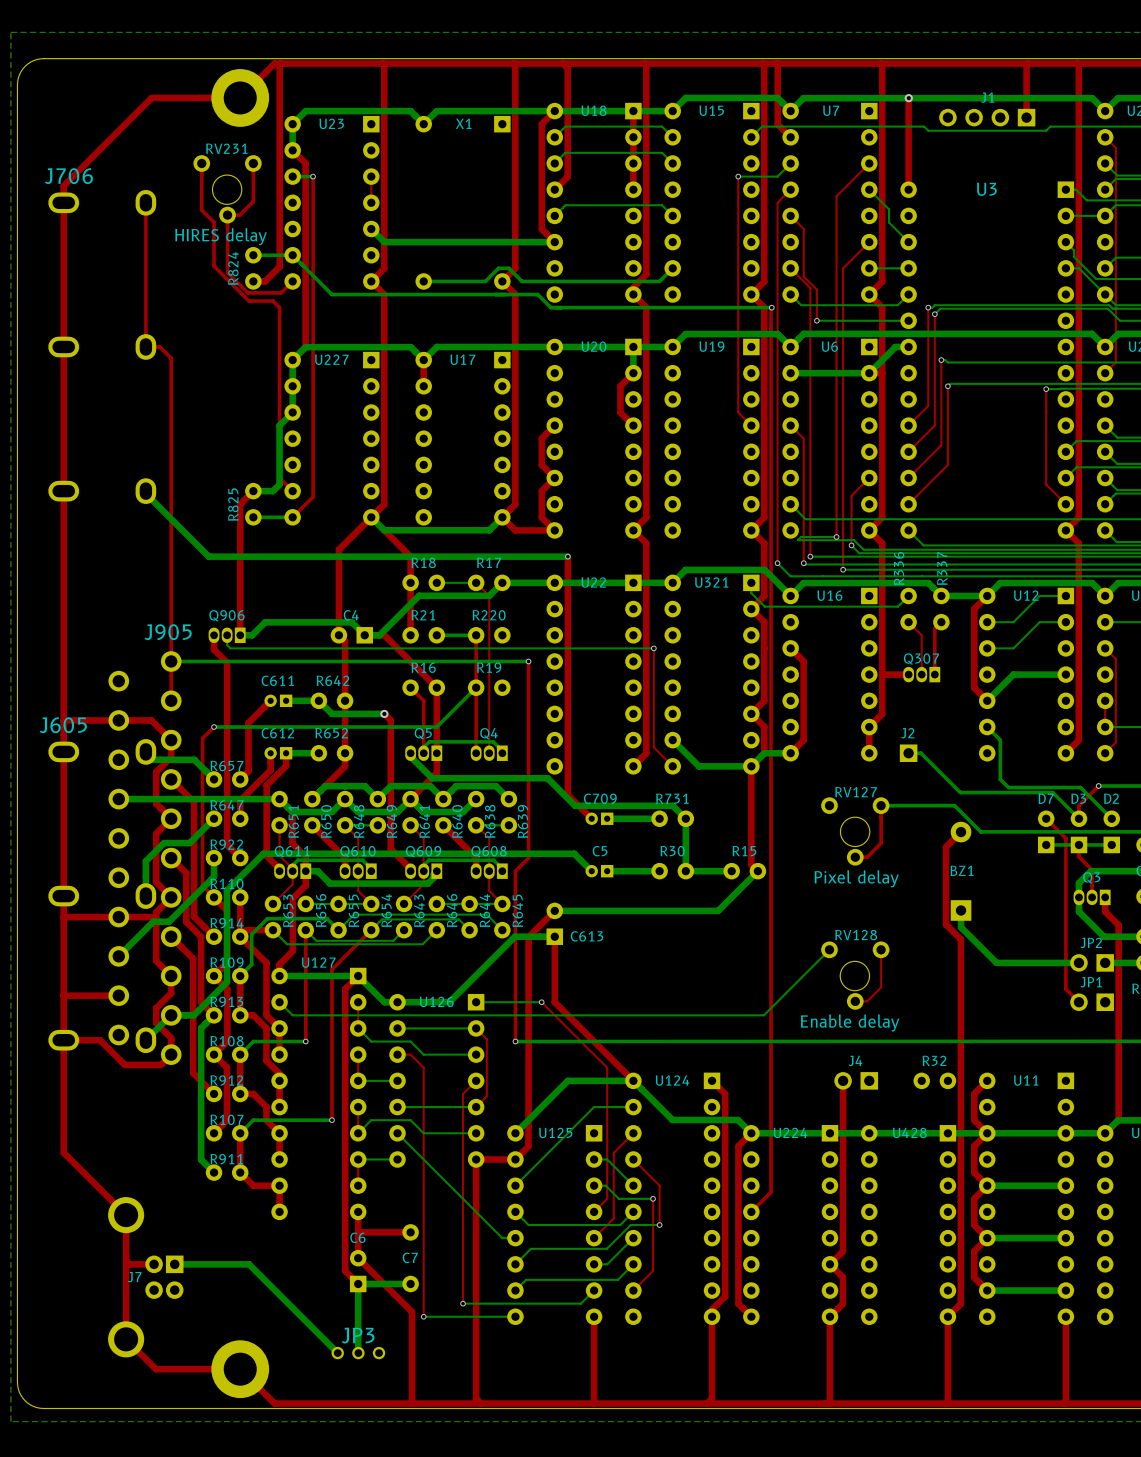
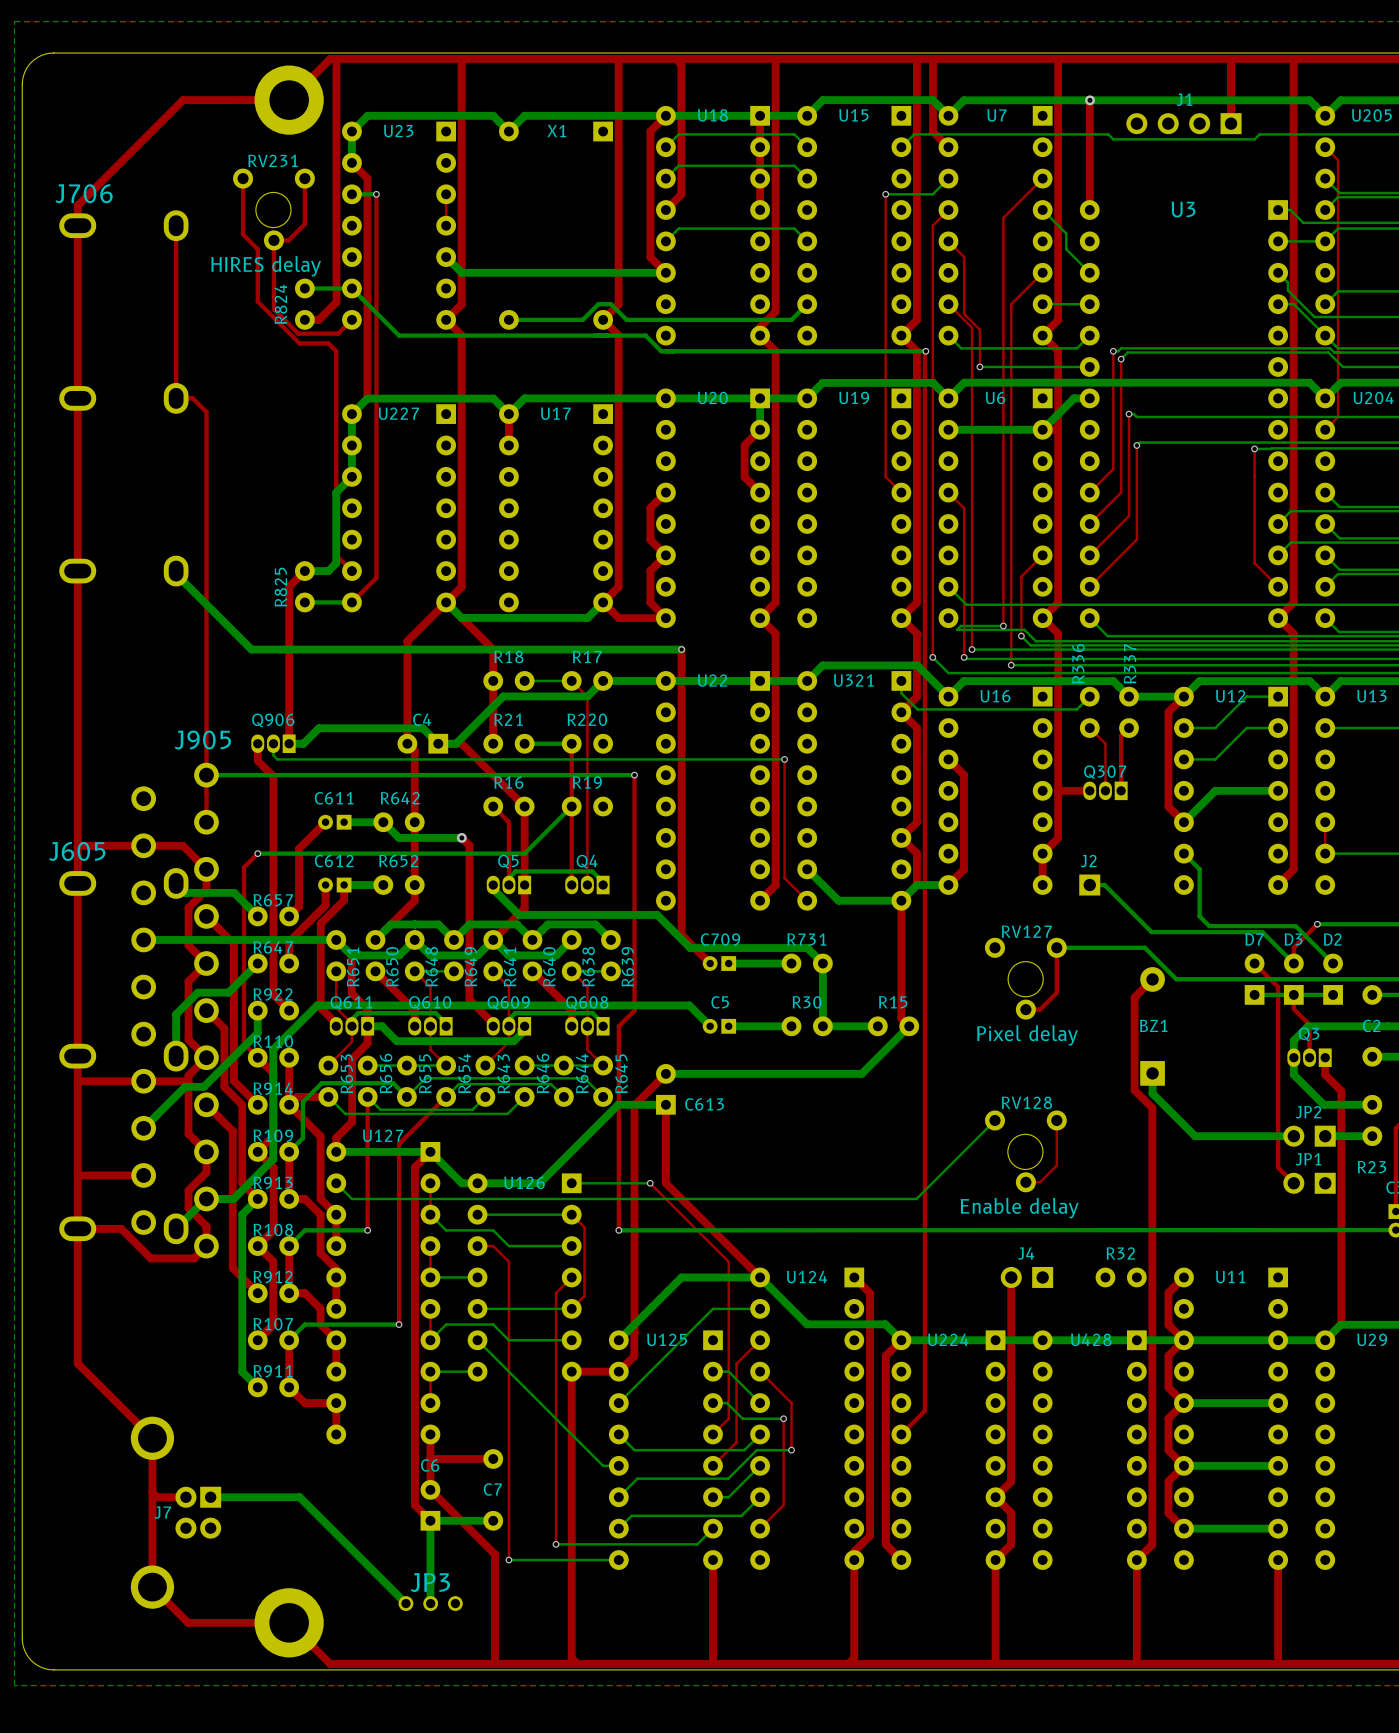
top track: (1105, 648) (1115, 659) (1115, 742) (1105, 753) -> none

